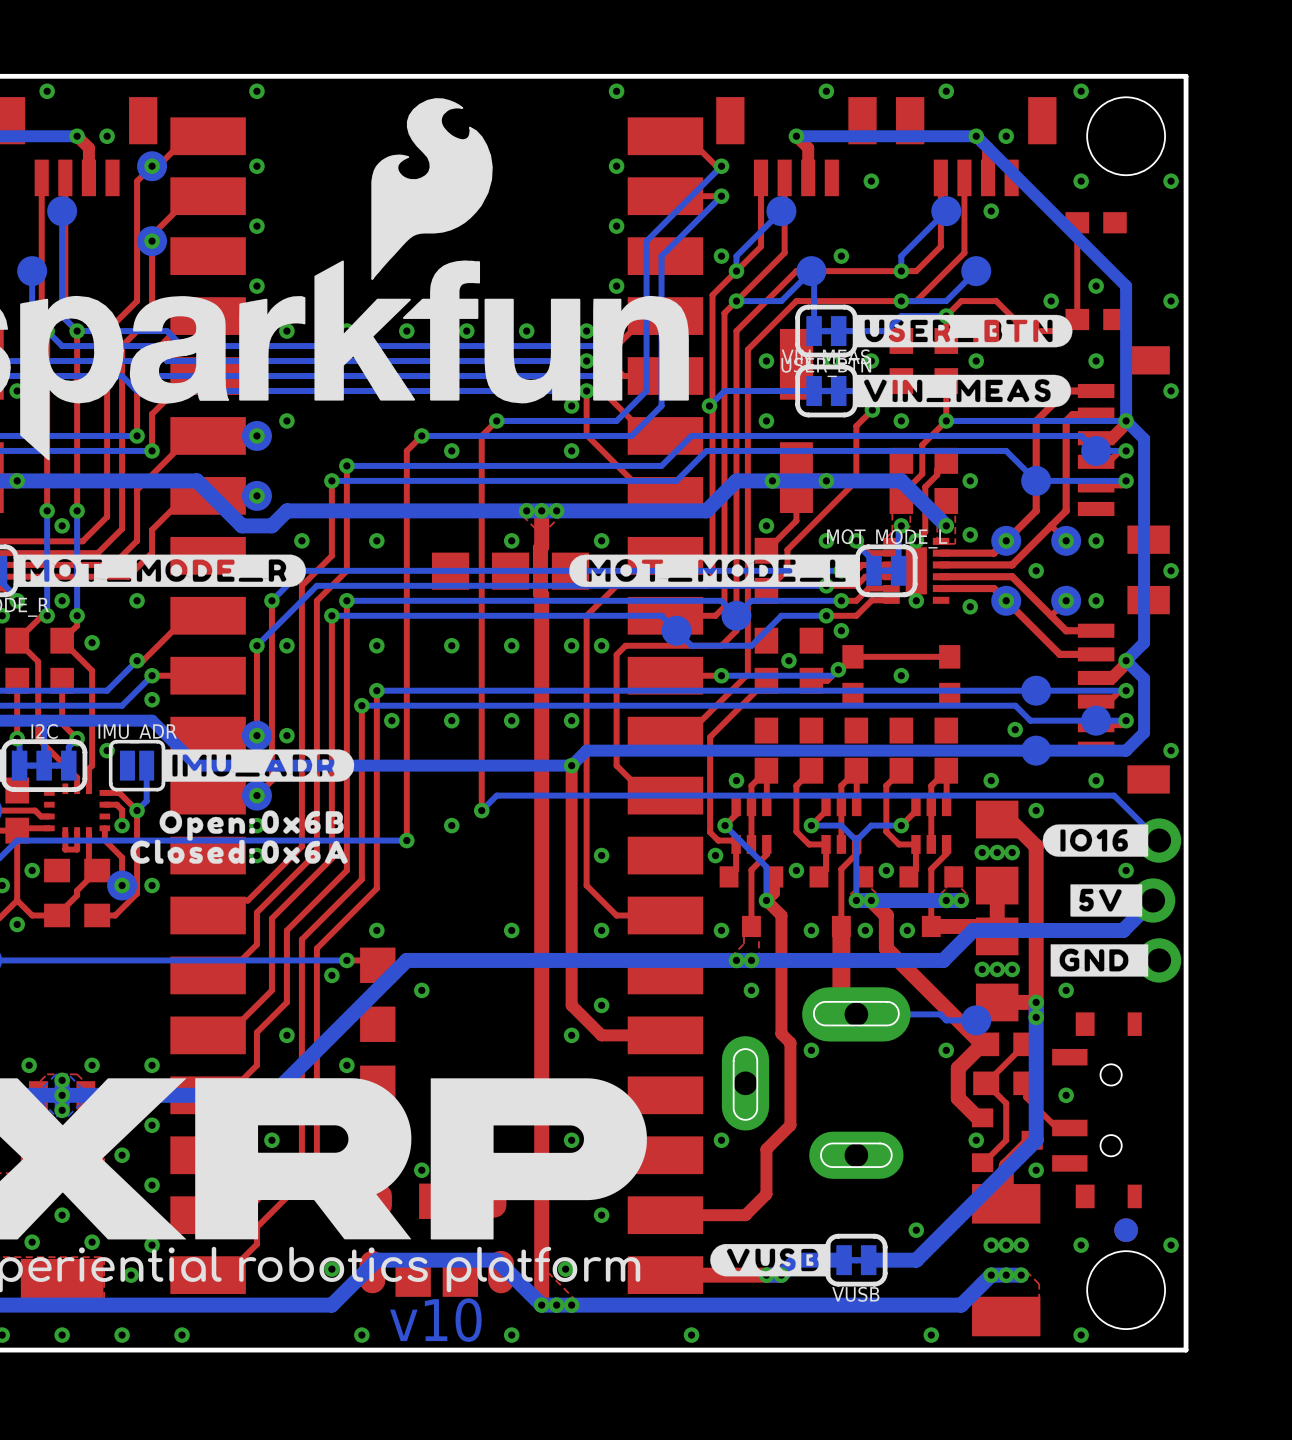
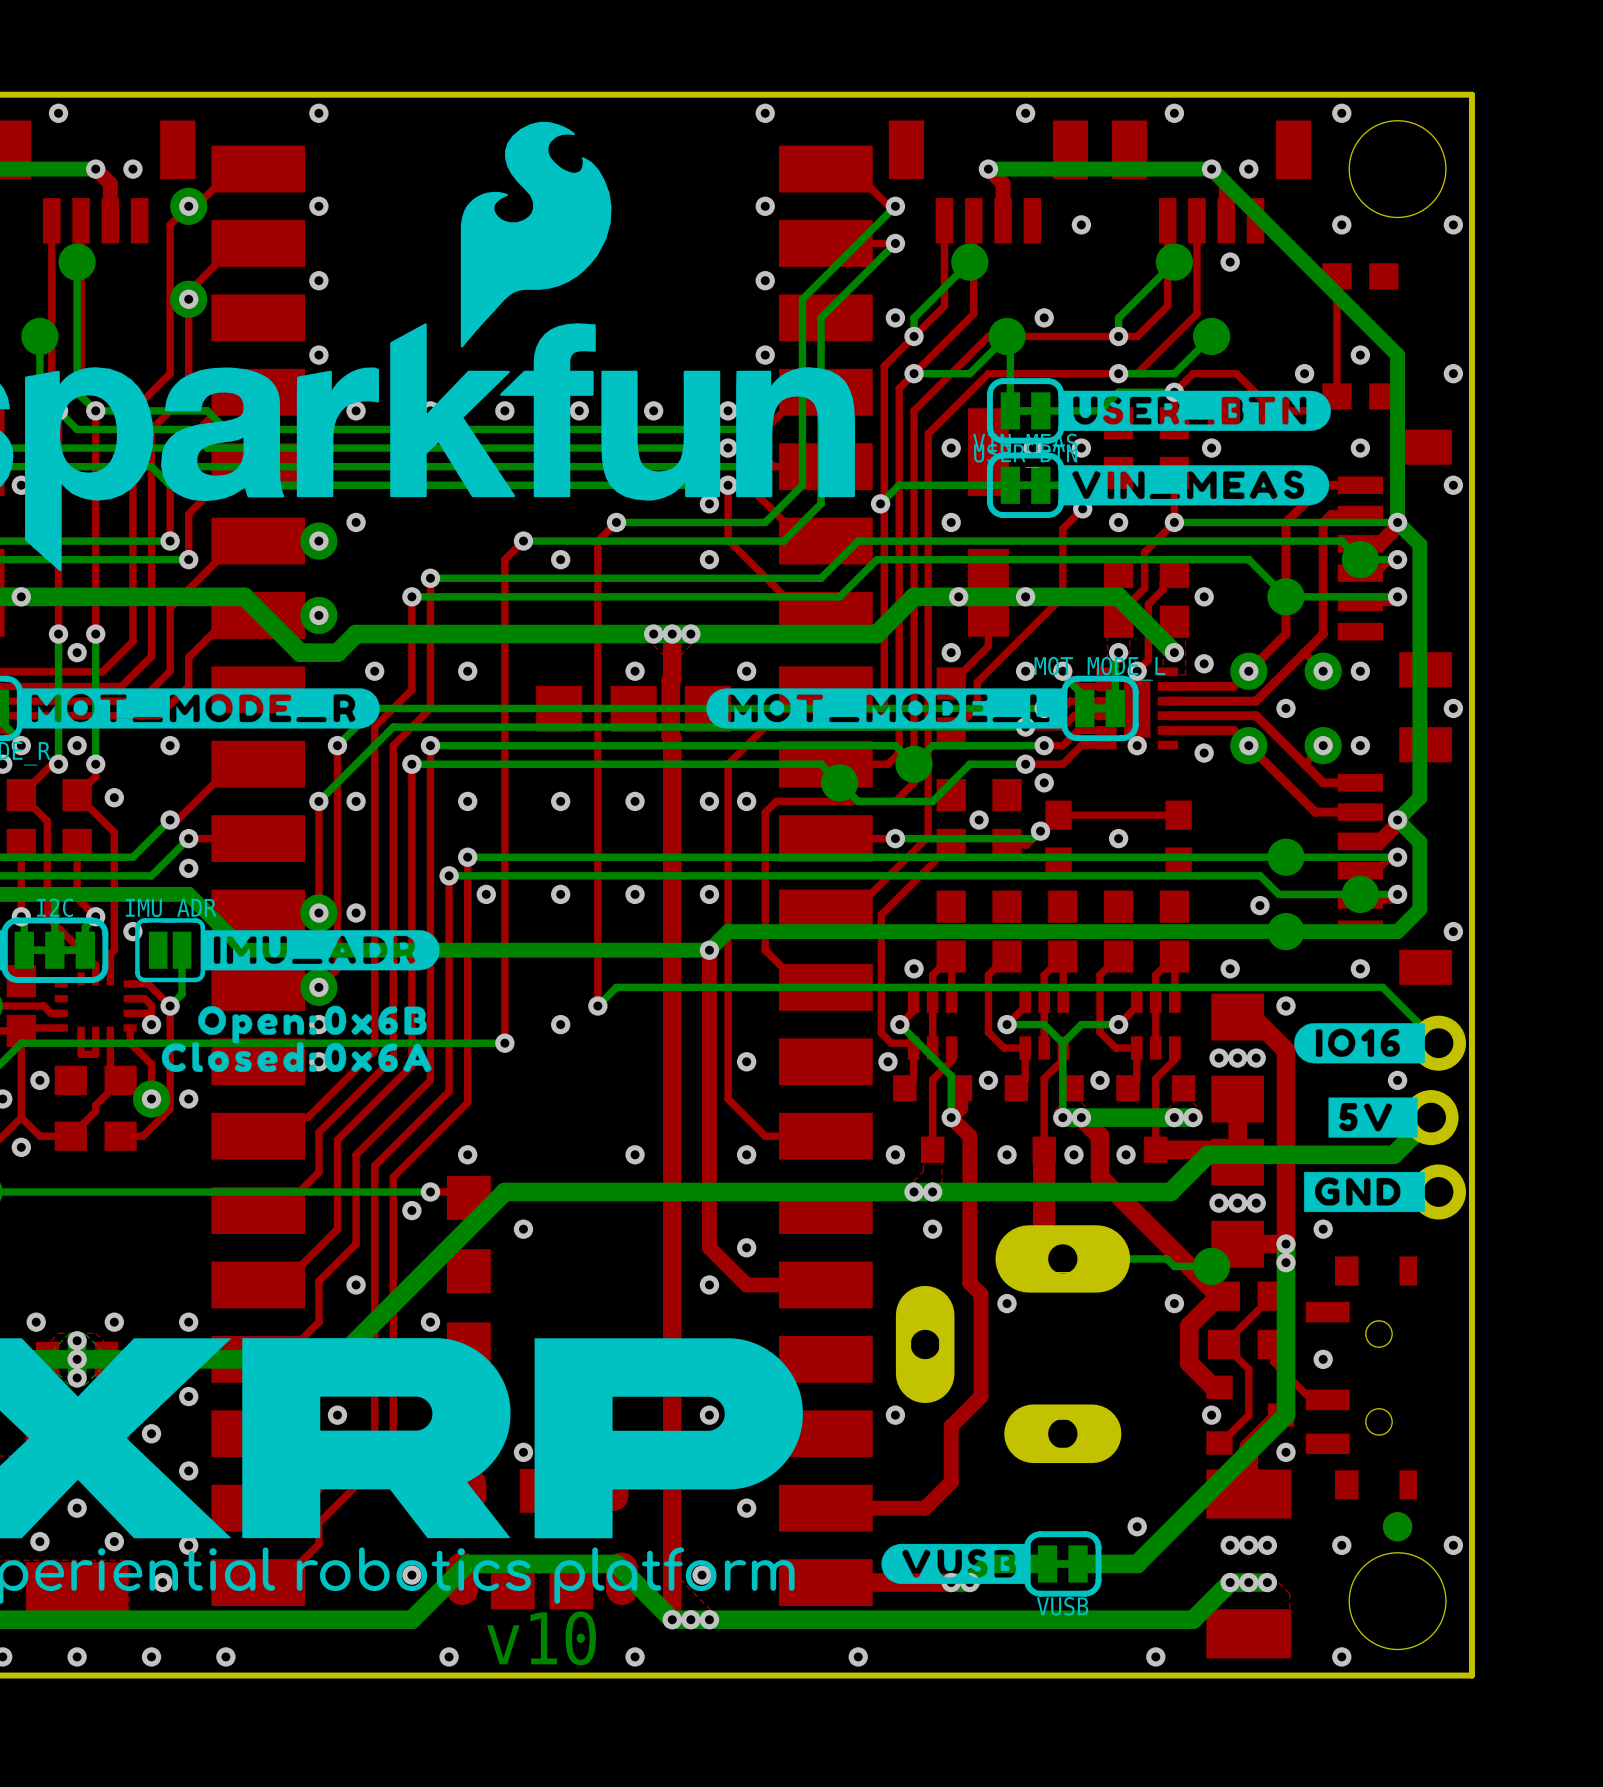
top track: none -> (151, 1013) (130, 1013)

